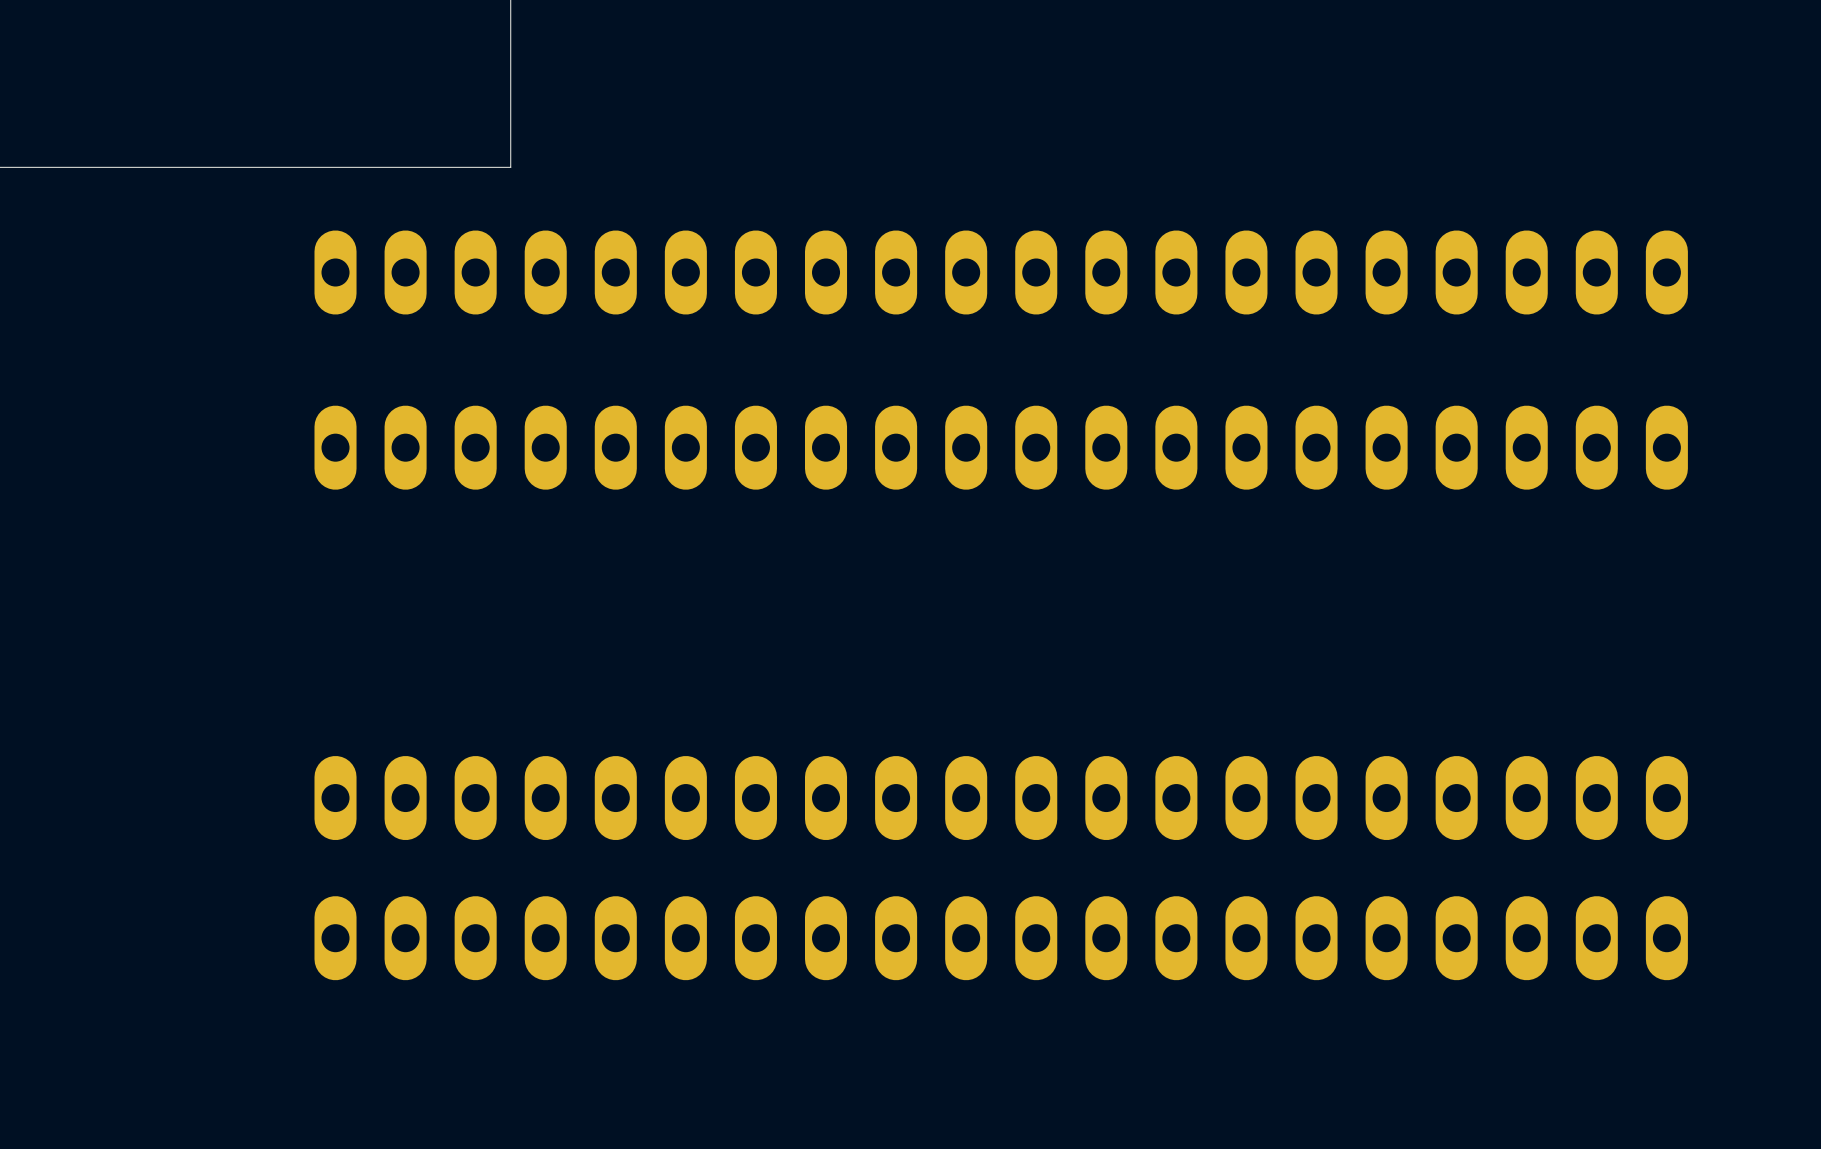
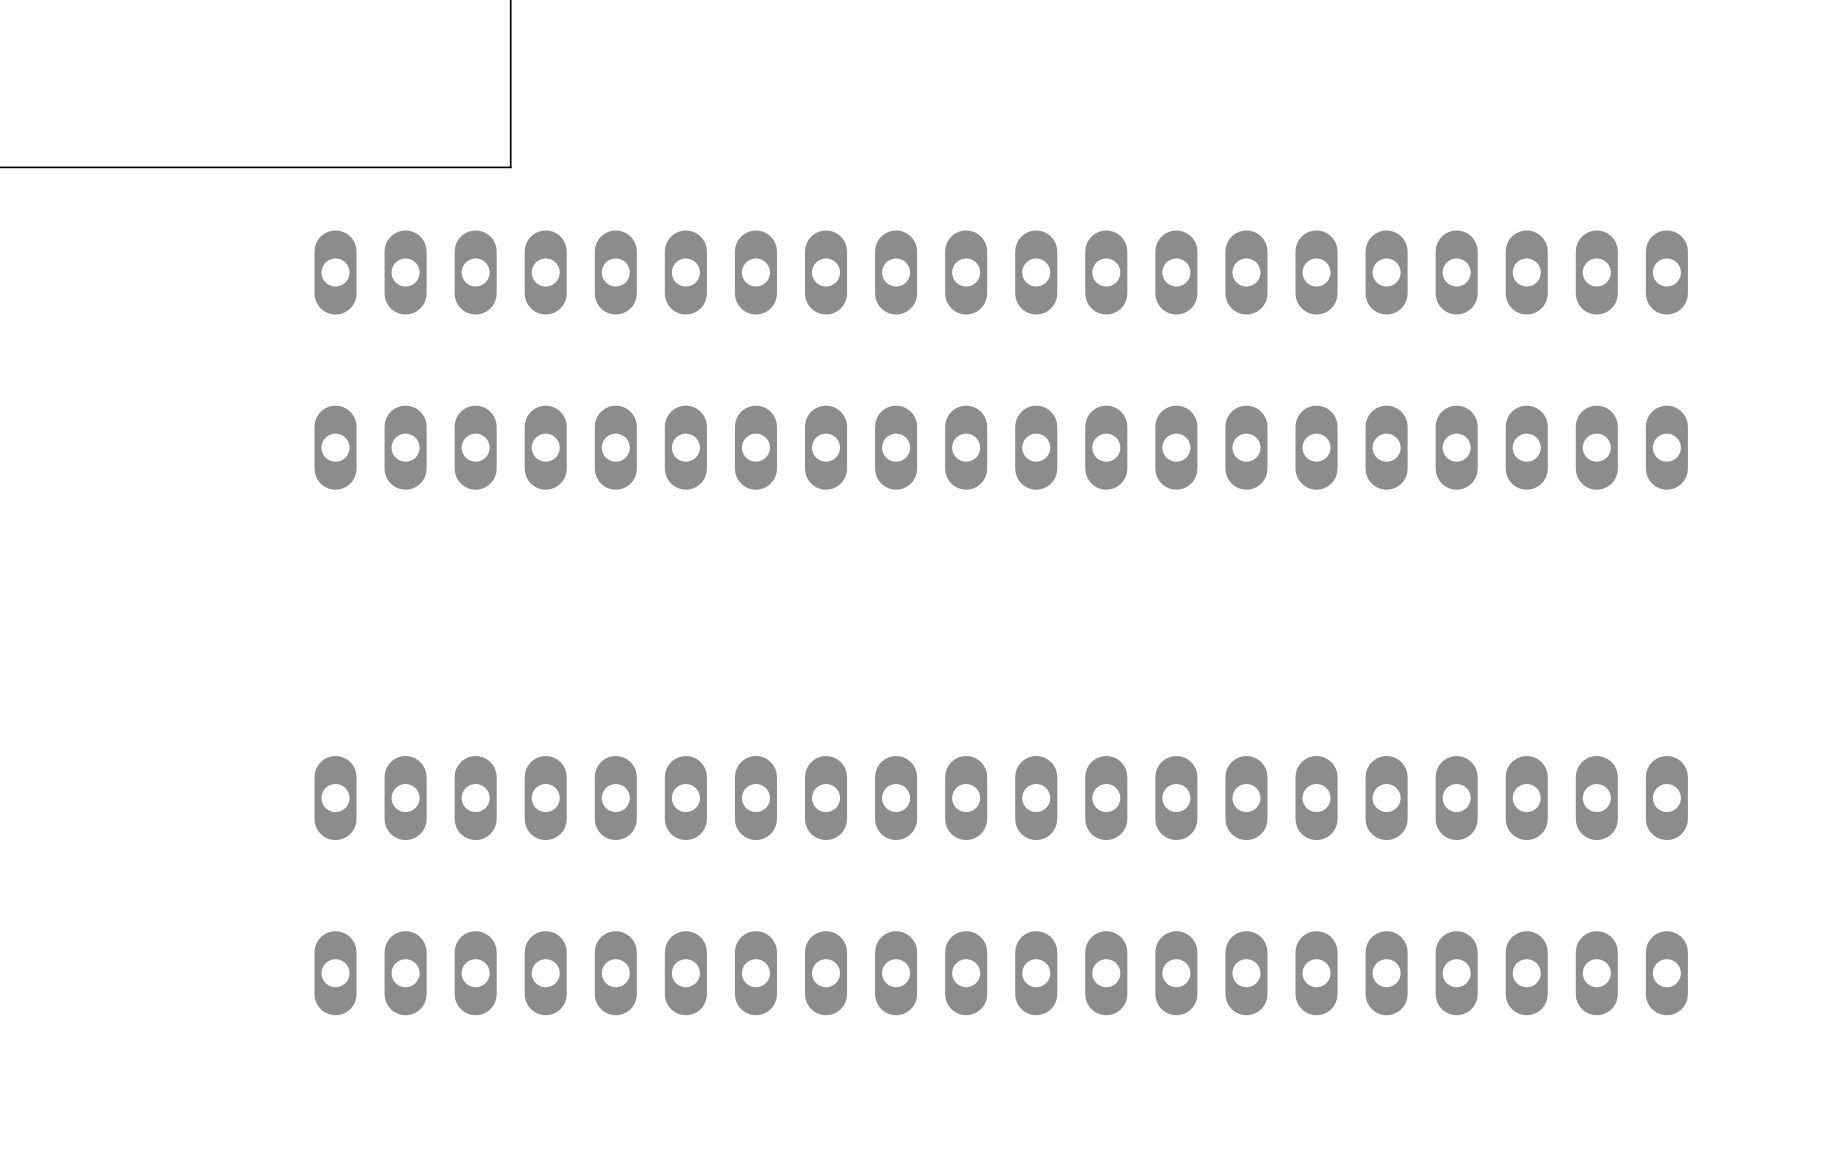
part position: (1001, 938) -> (1001, 973)

